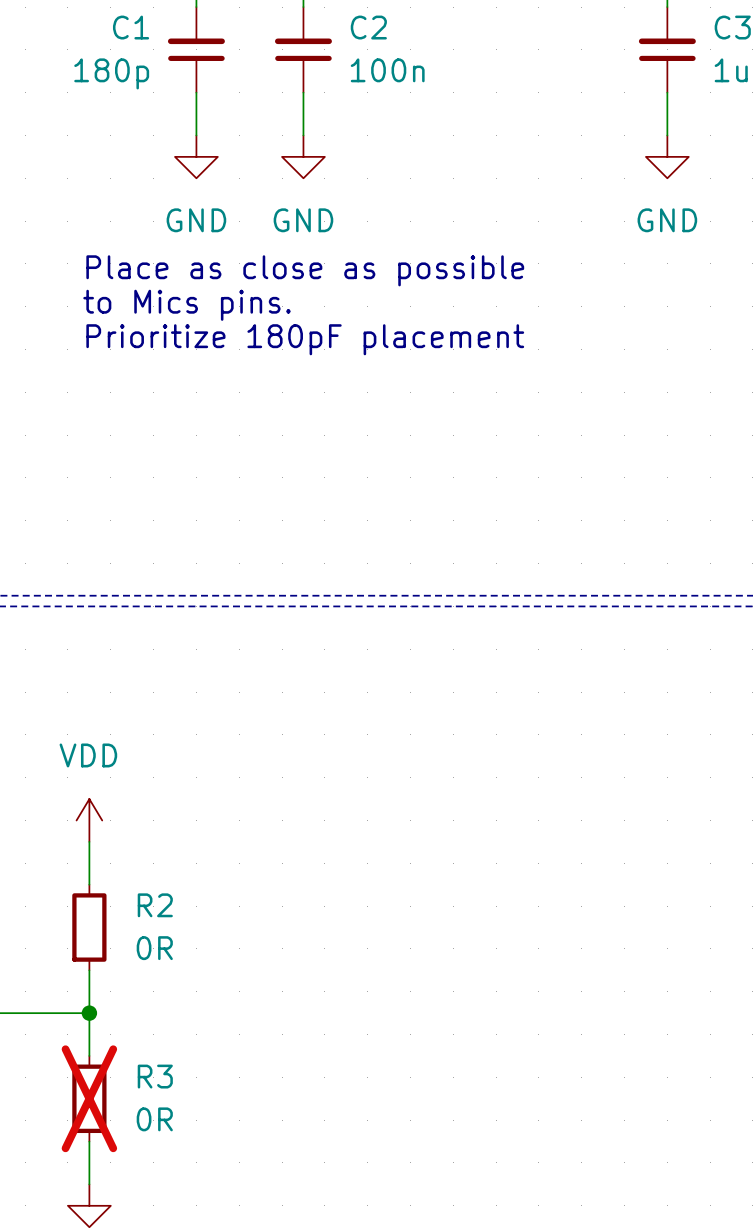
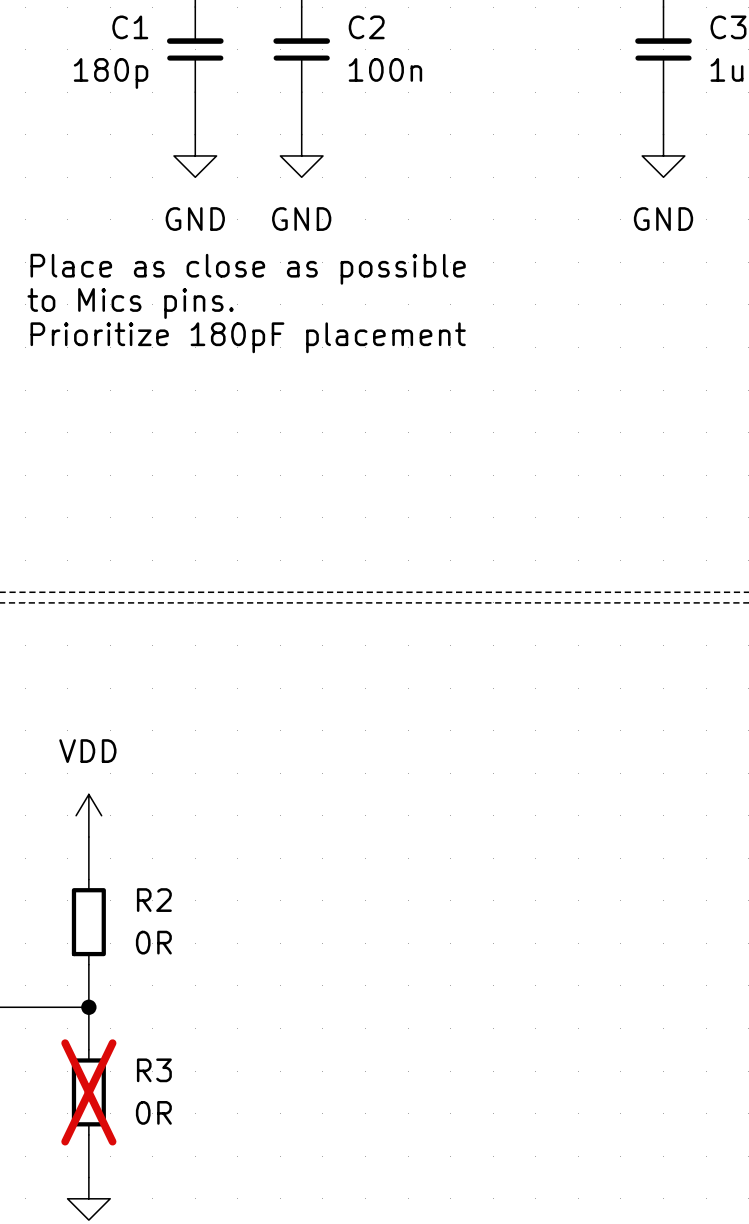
text position: Place as close as possible (305, 270) -> Place as close as possible (248, 269)
text position: to Mics pins. (187, 305) -> to Mics pins. (130, 303)
text position: Prioritize 180pF placement (305, 339) -> Prioritize 180pF placement (248, 337)

